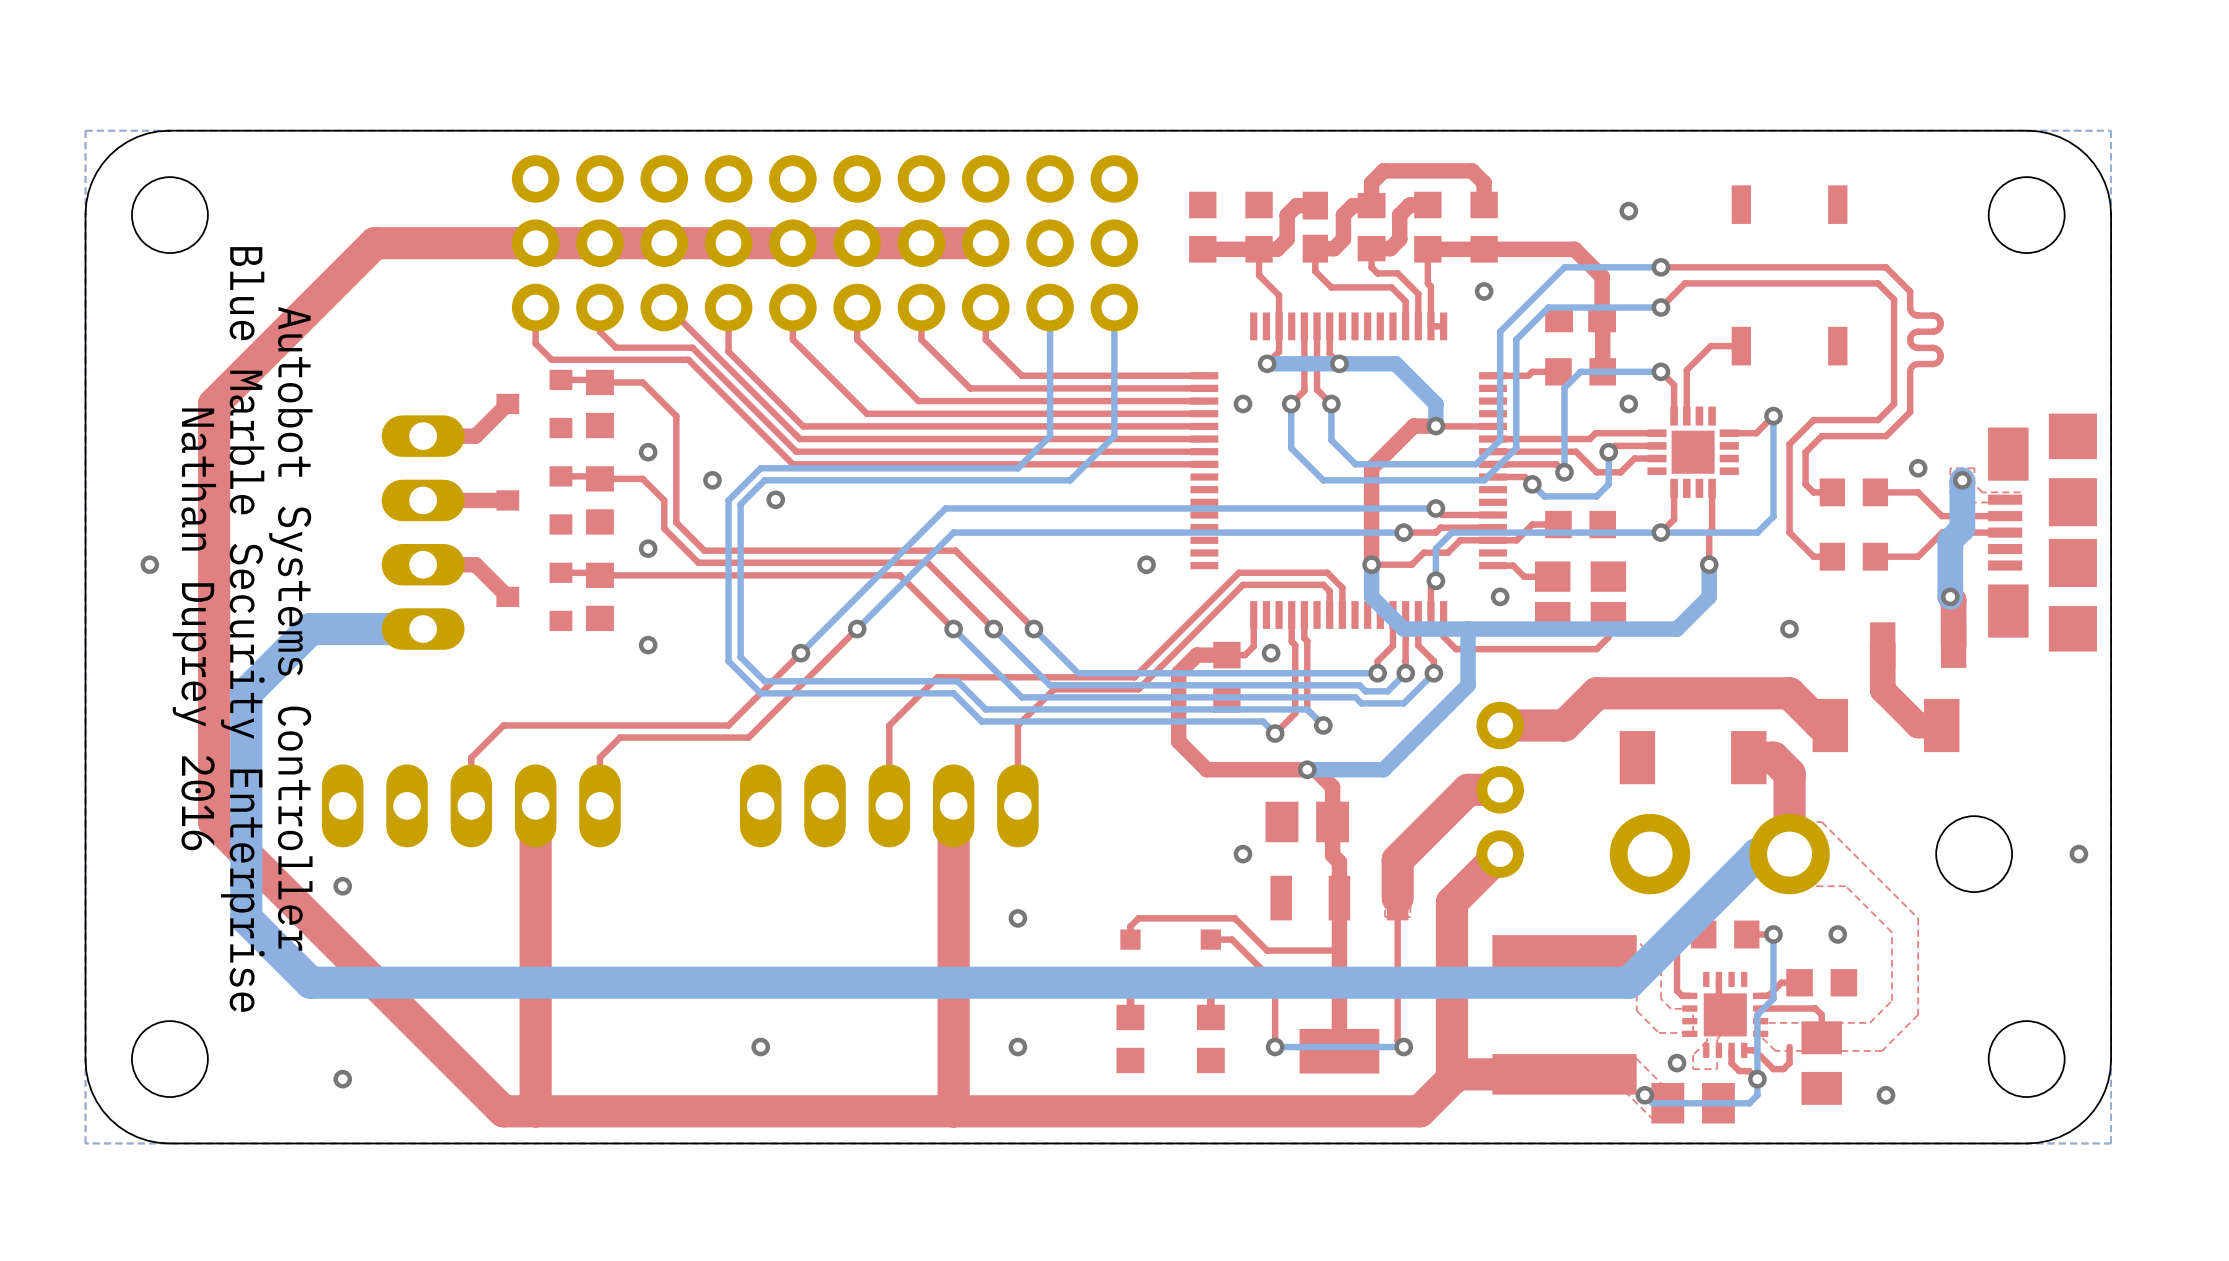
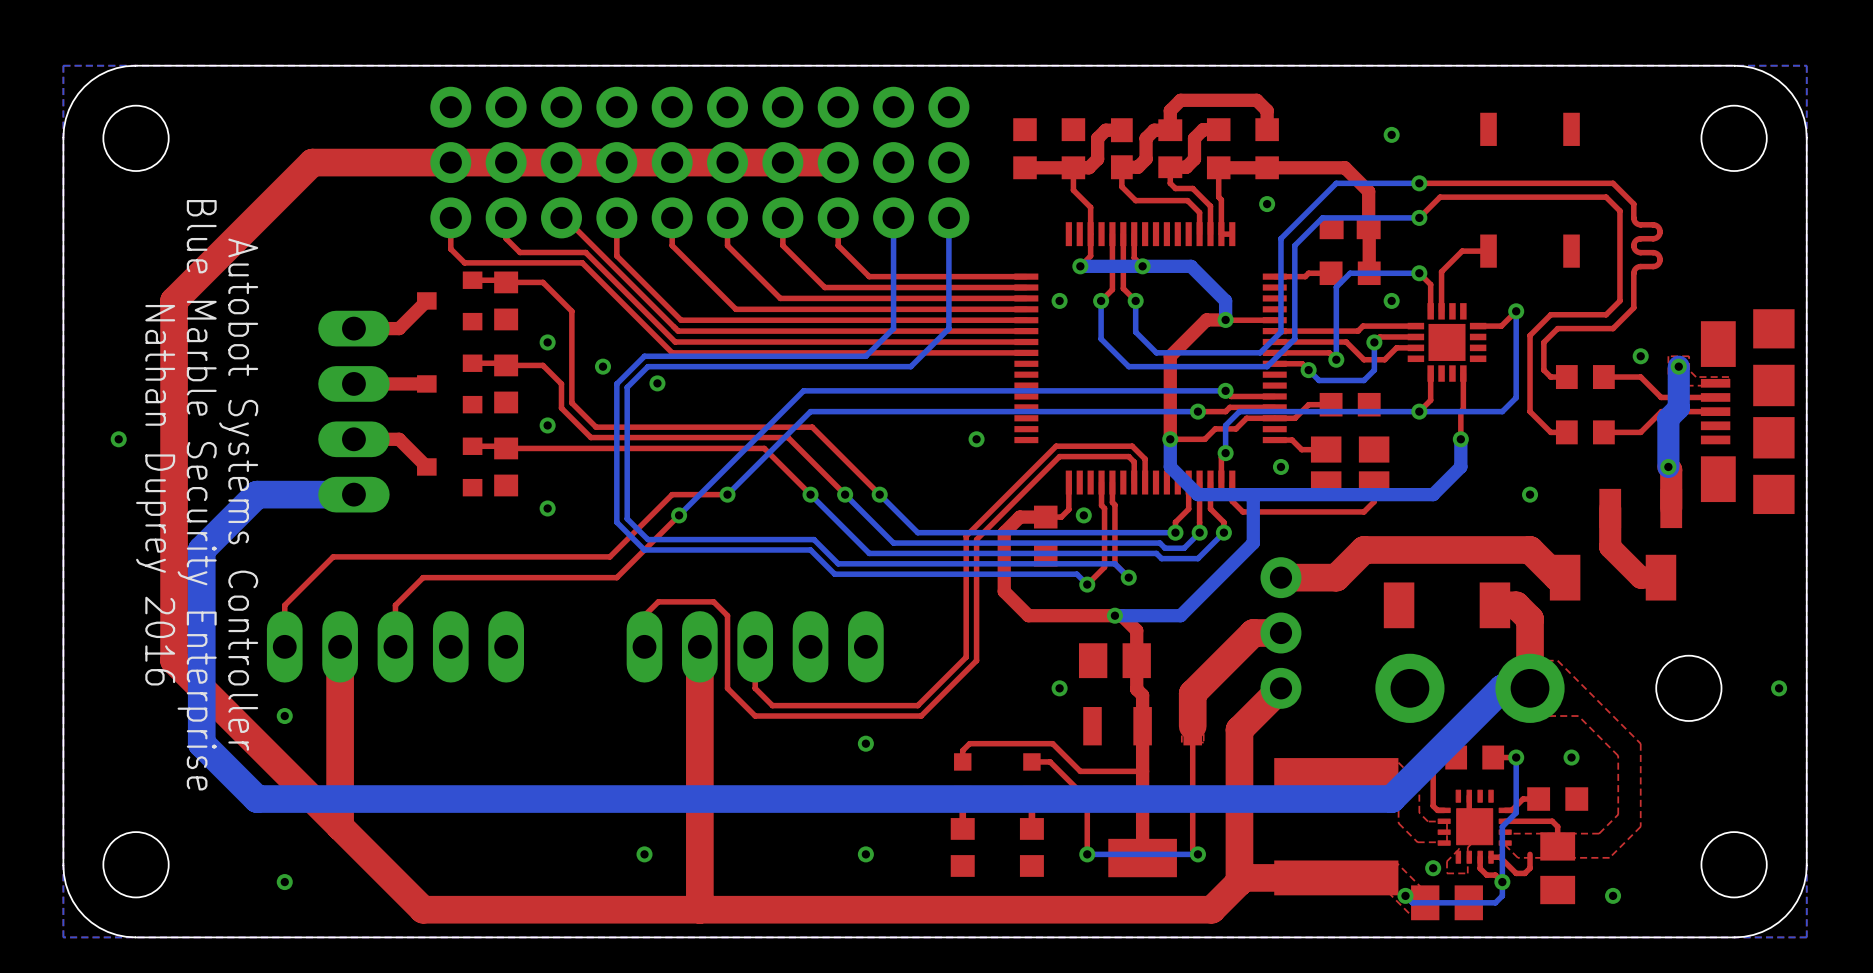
top track: (857, 629) (748, 737) (620, 737) (599, 757) (599, 805) -> (727, 494) (672, 494) (609, 556) (333, 556) (284, 605) (284, 646)
top track: (1134, 677) (937, 677) (889, 725) (889, 805) -> (966, 536) (966, 657) (917, 705) (772, 705) (755, 688) (755, 646)
top track: (1146, 681) (1138, 689) (1054, 689) (1017, 725) (1017, 805) -> (976, 539) (976, 660) (921, 716) (755, 716) (727, 688) (727, 615) (713, 601) (658, 601) (644, 615) (644, 646)
top track: none -> (340, 646) (340, 826)
top track: (535, 805) (535, 1111) -> none
top track: (953, 805) (953, 1111) -> (699, 646) (699, 909)

